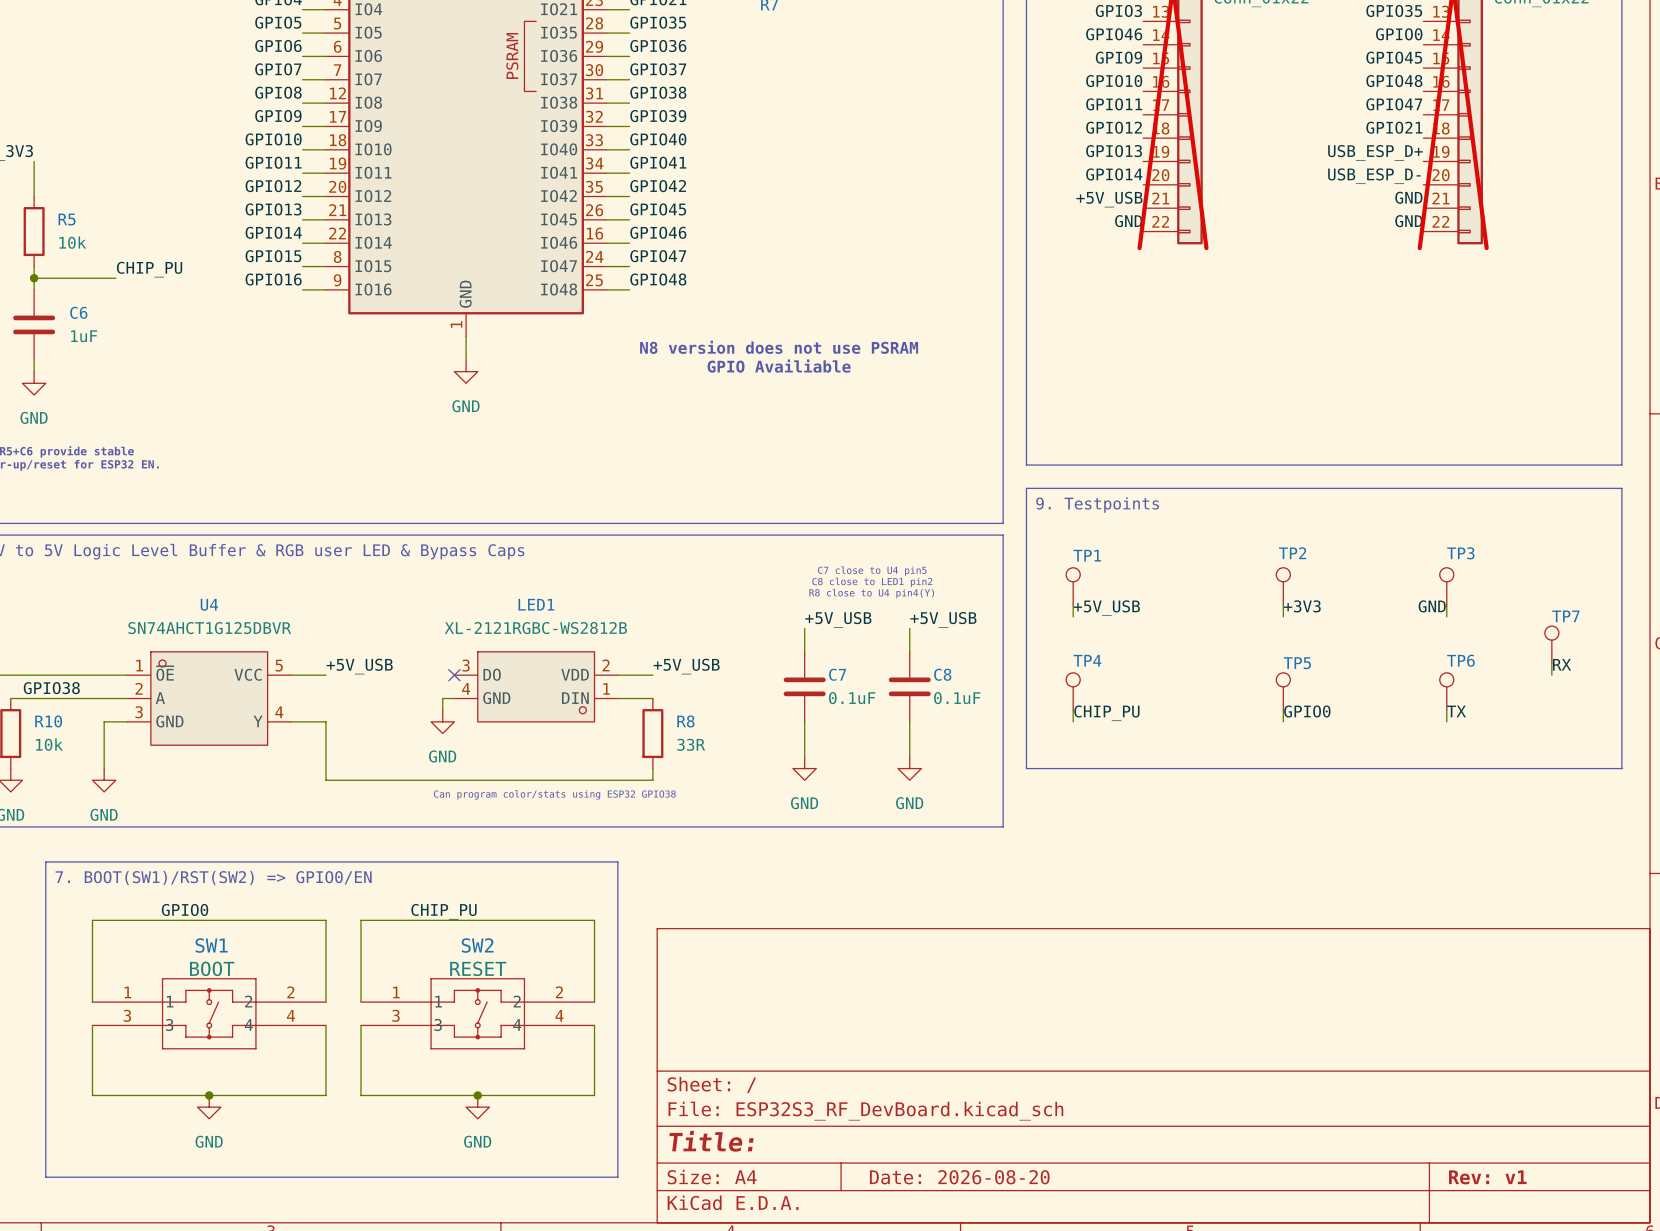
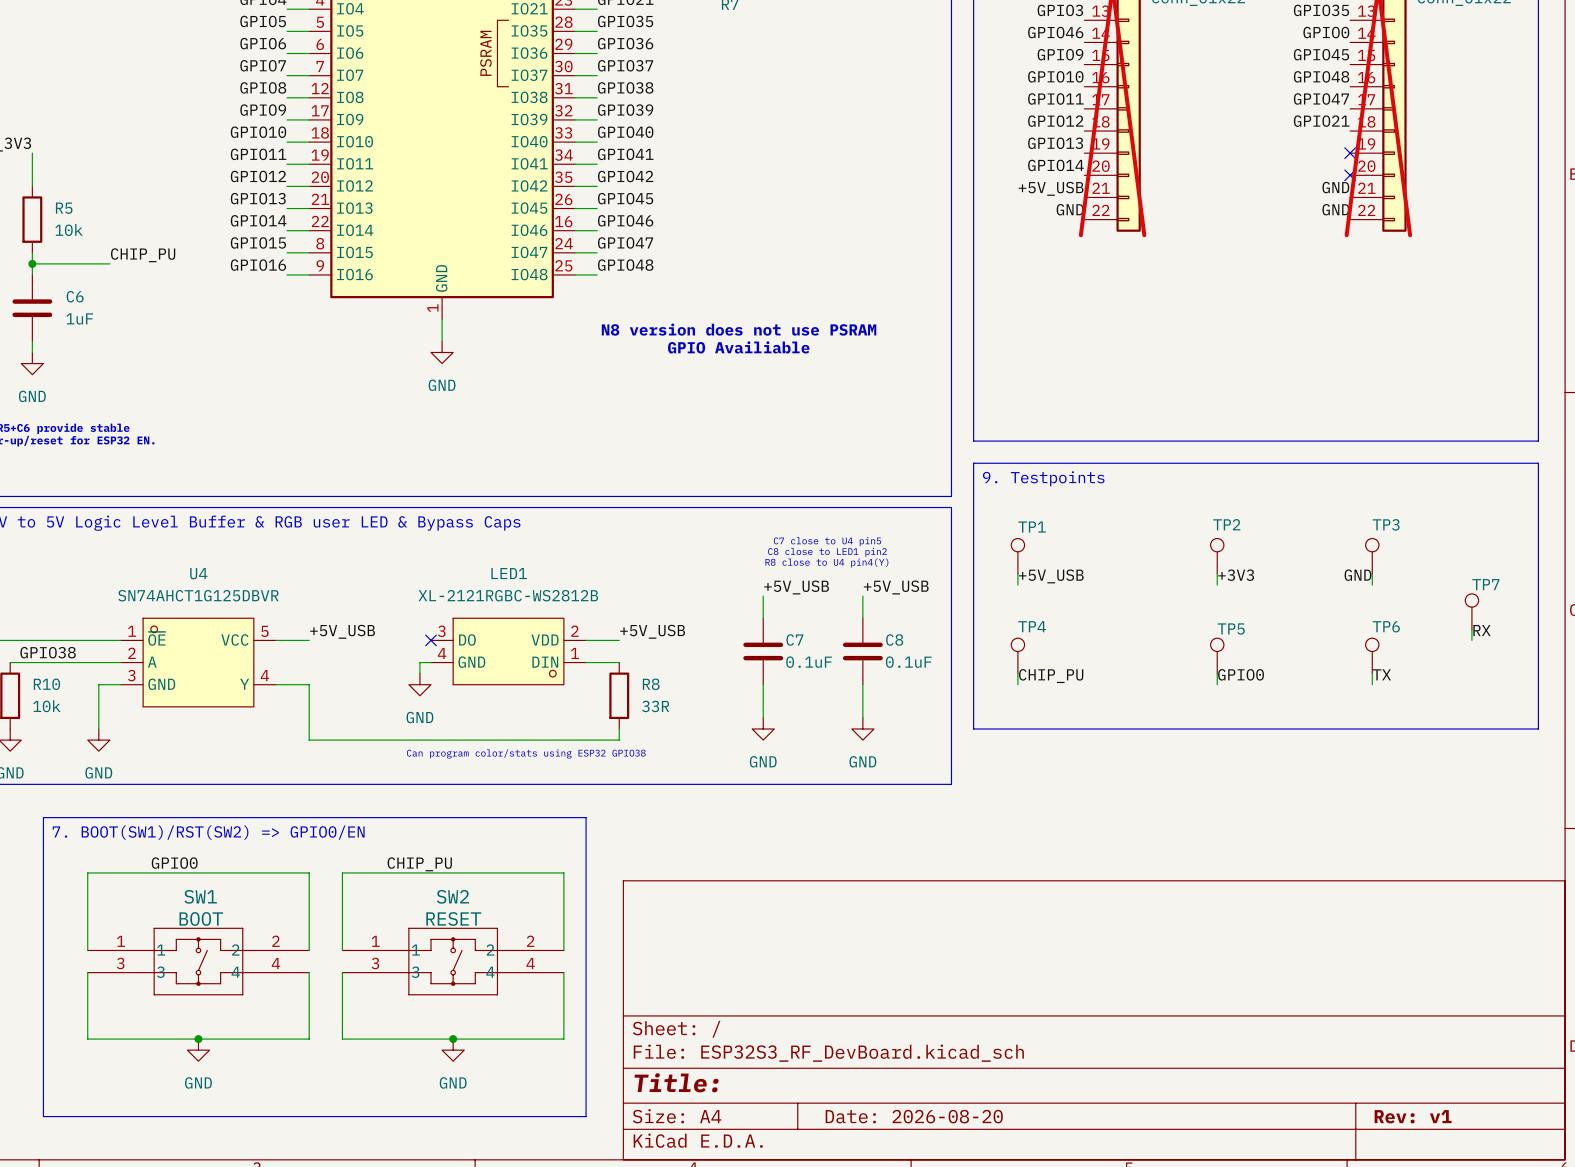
label: USB_ESP_D+ (1375, 152) -> none
no-connect mark: none -> (1350, 153)
label: USB_ESP_D- (1374, 176) -> none
no-connect mark: none -> (1350, 175)

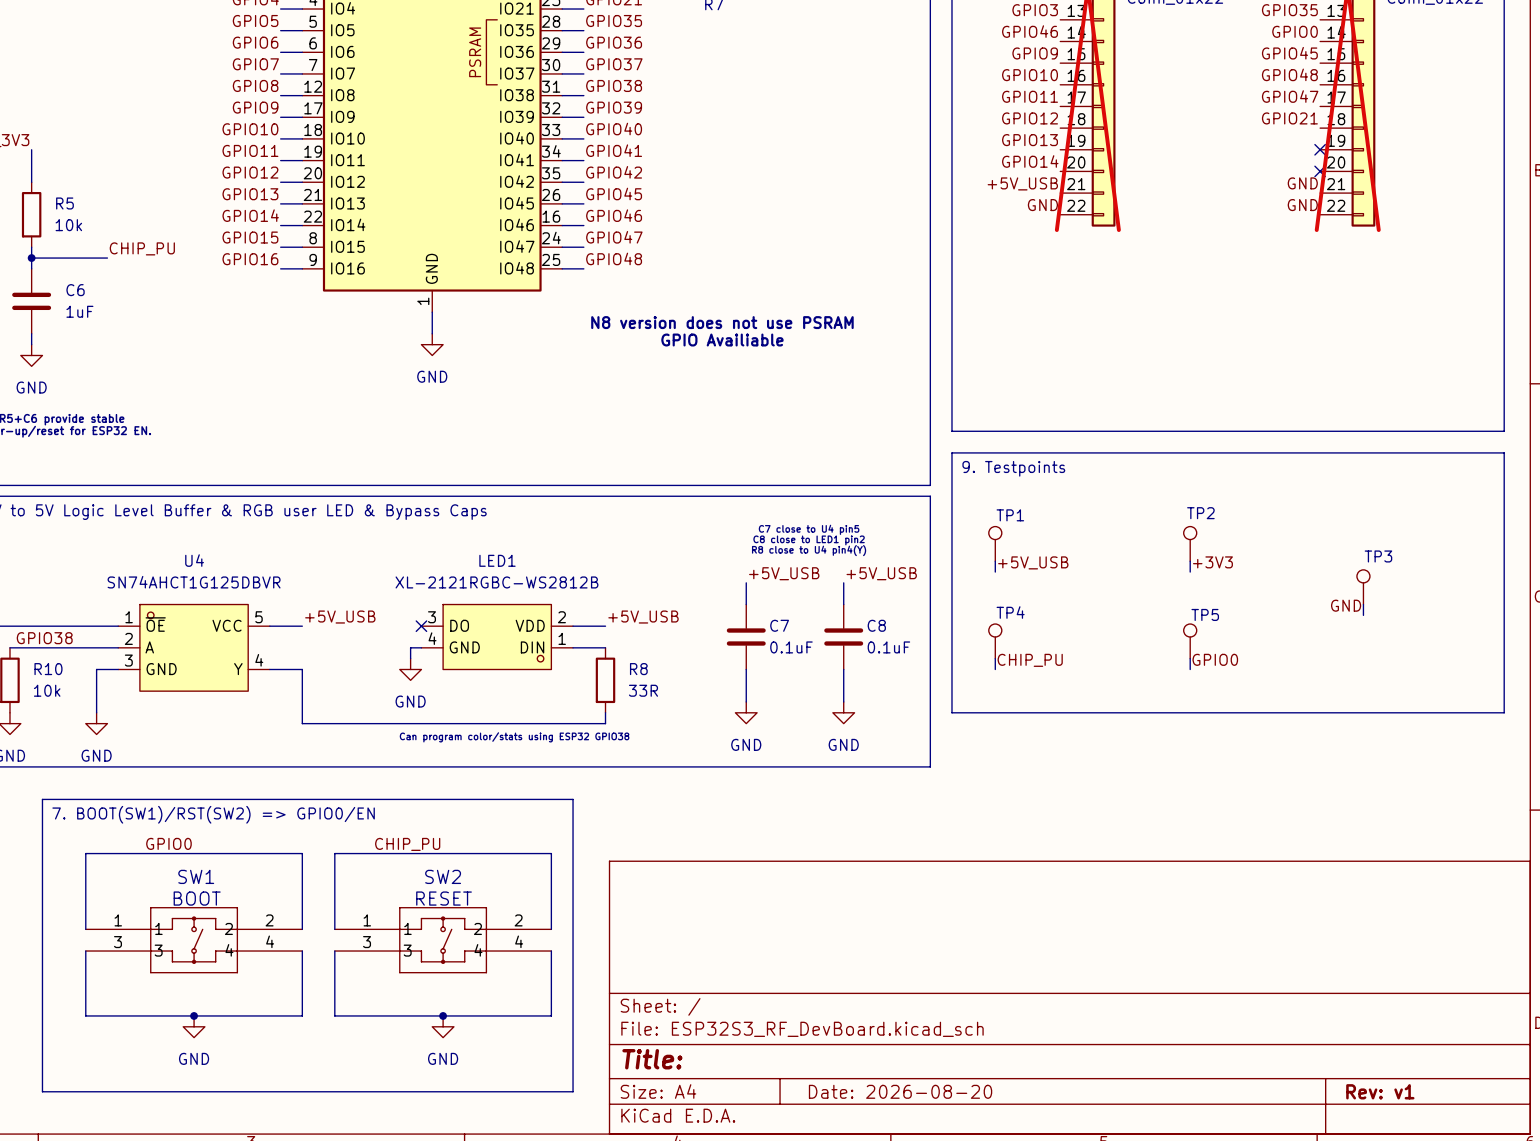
TP3 position: (1372, 556) -> (1363, 587)
wire: (1372, 573) (1372, 585) -> (1363, 604) (1363, 615)
label position: GND (1358, 575) -> GND (1346, 605)
TP7: (1471, 611) -> none
wire: (1471, 629) (1471, 640) -> none
label: RX (1481, 630) -> none
TP6: (1372, 655) -> none
wire: (1372, 673) (1372, 684) -> none
label: TX (1381, 674) -> none

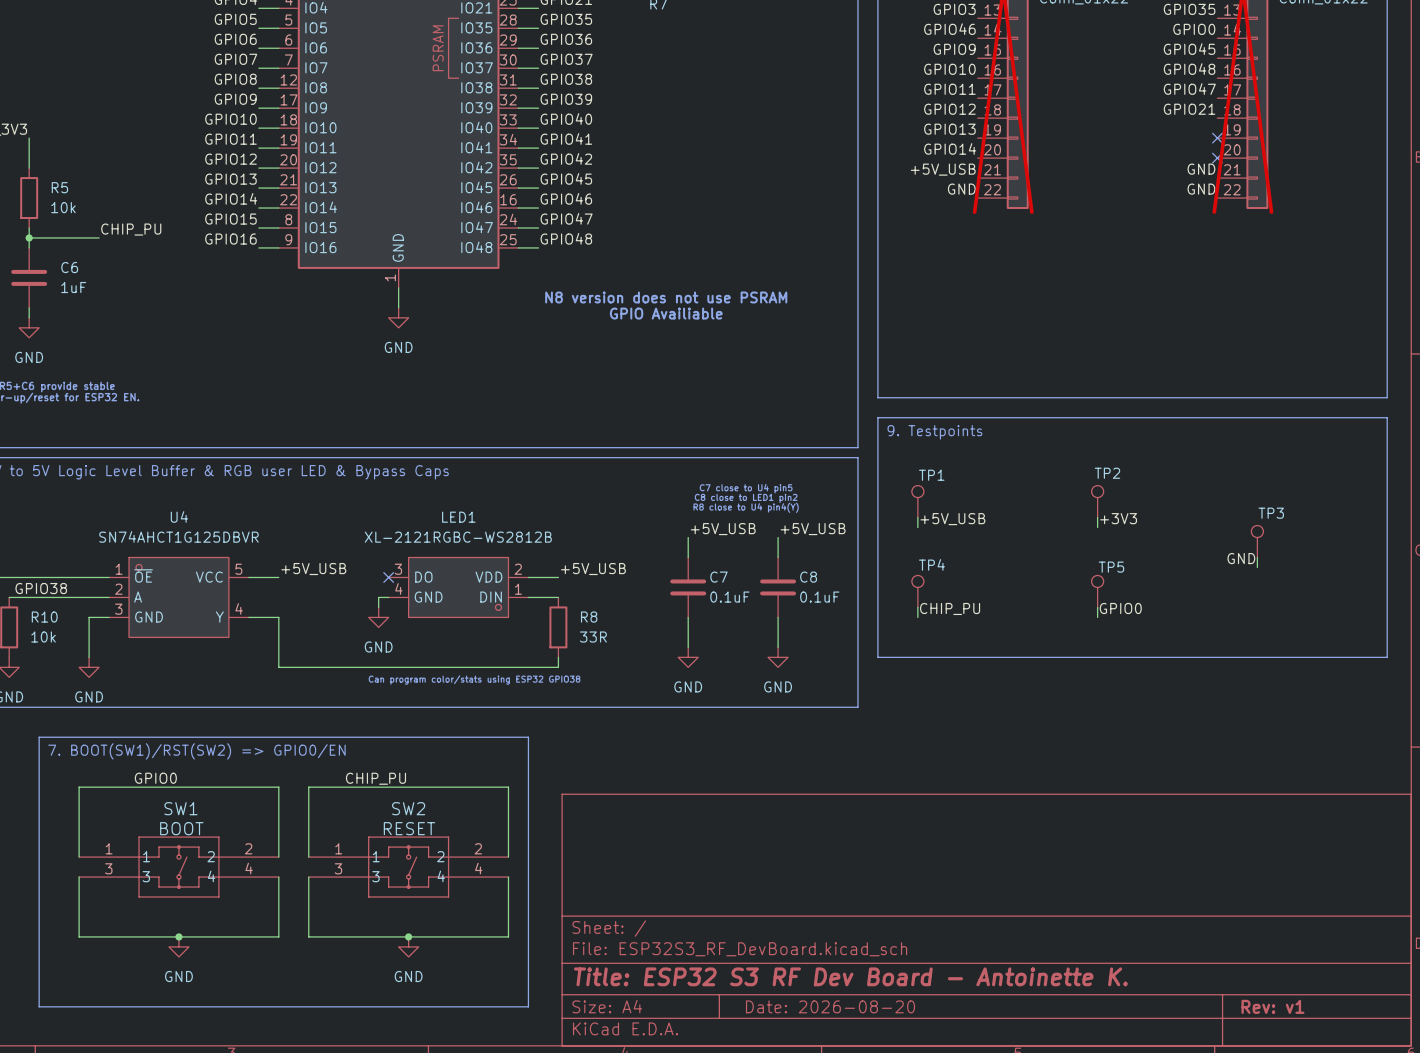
title block: Title: (652, 1059) -> Title: ESP32 S3 RF Dev Board - Antoinette K. (850, 976)

